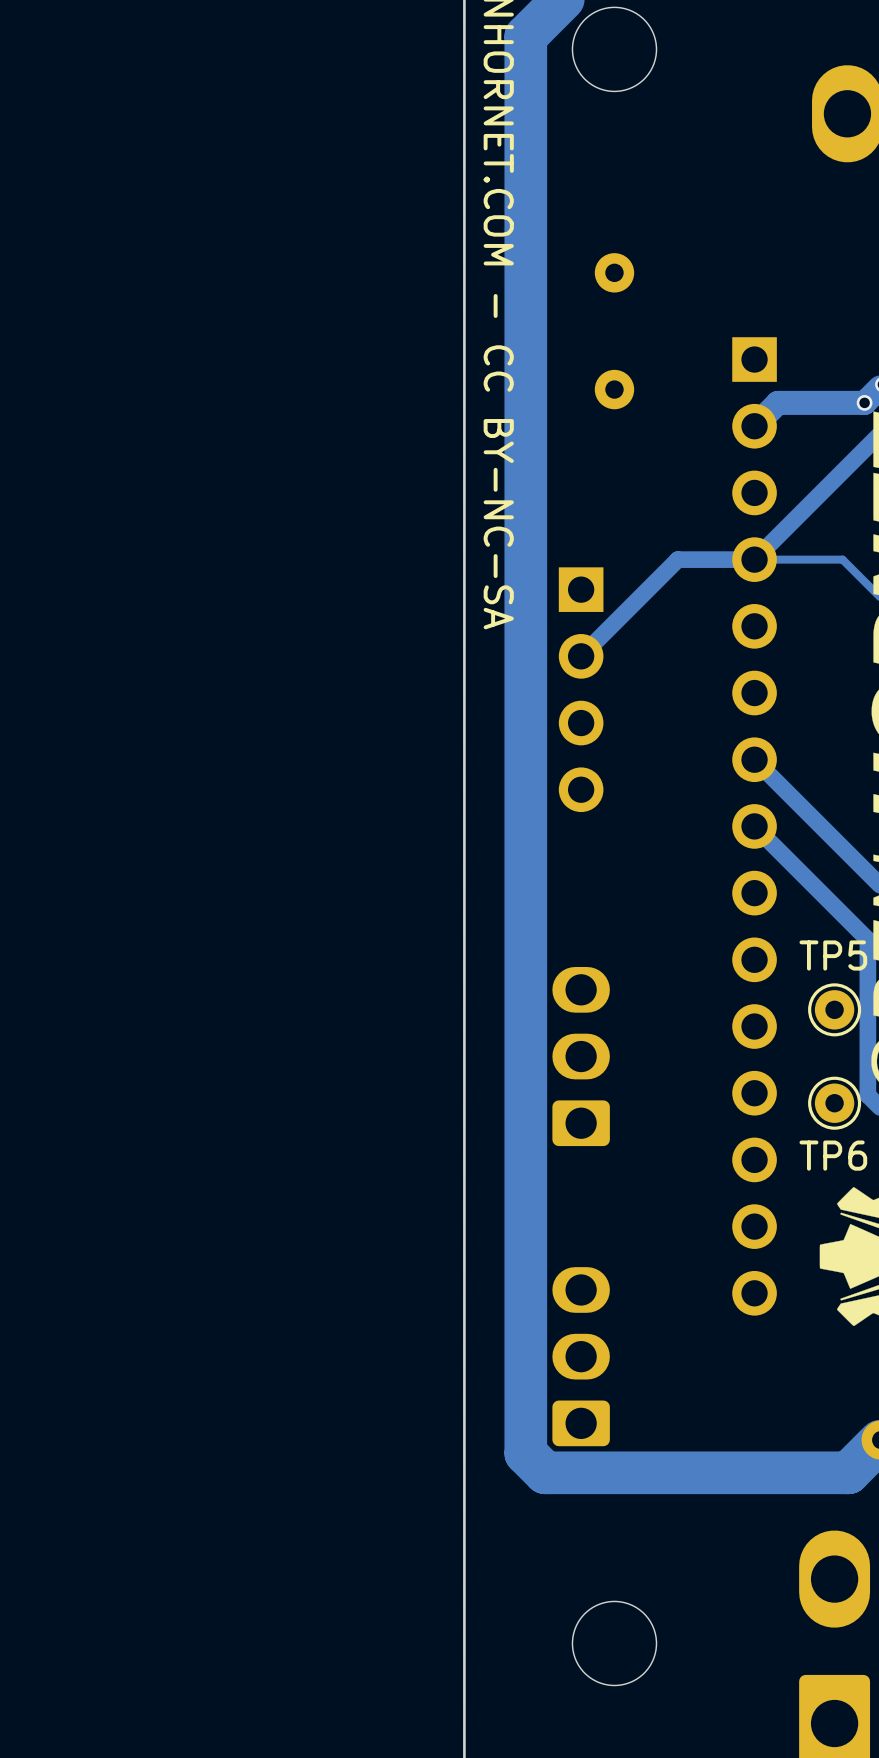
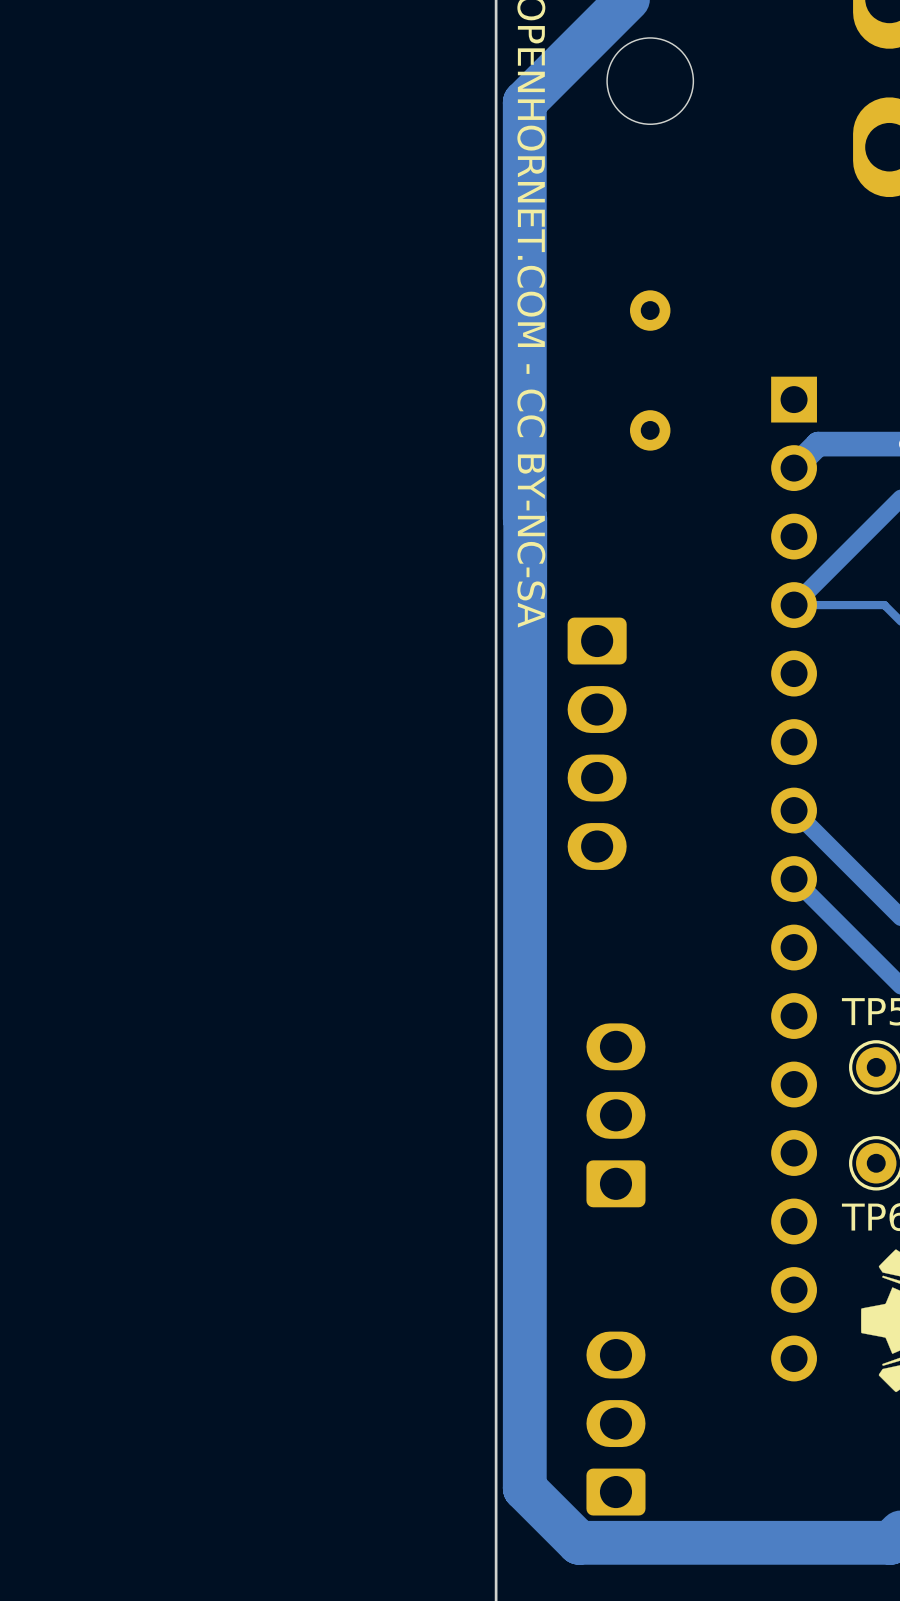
track: (525, 36) (525, 1453) -> (559, 67) (524, 102) (524, 1488) (559, 1522)
track: (752, 559) (677, 559) (581, 656) -> none
part footprint: [558, 567, 604, 813] -> [567, 617, 627, 870]

